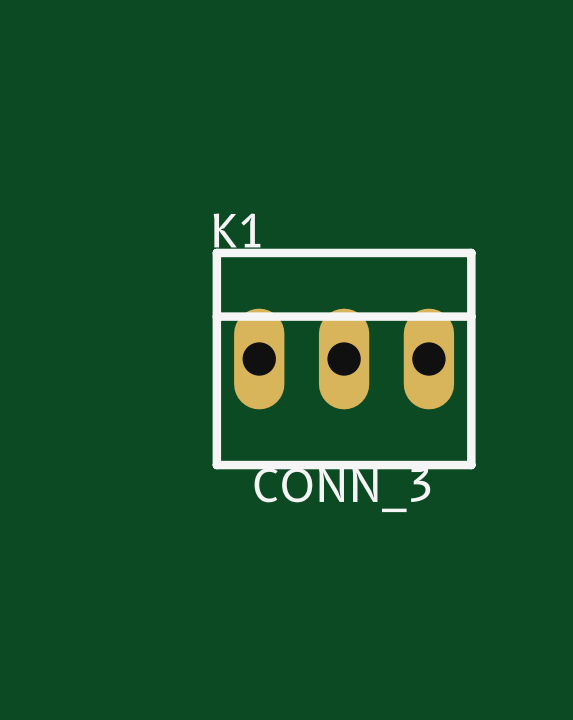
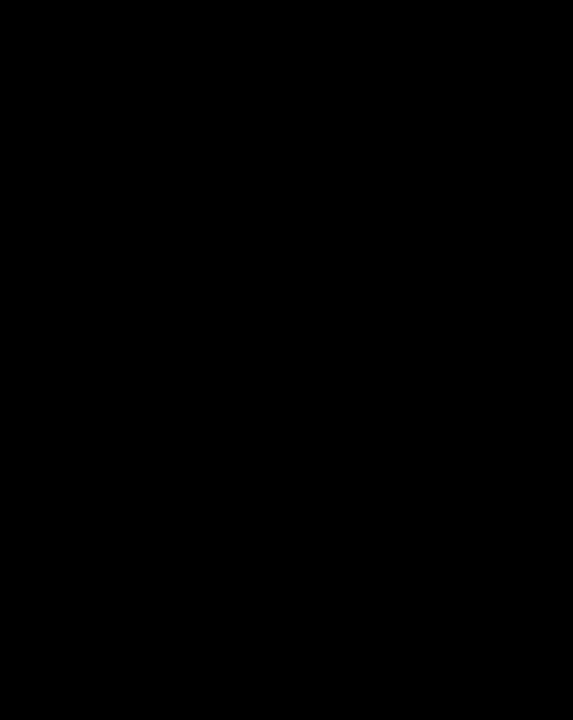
K1: CONN_3 (344, 359) -> none

